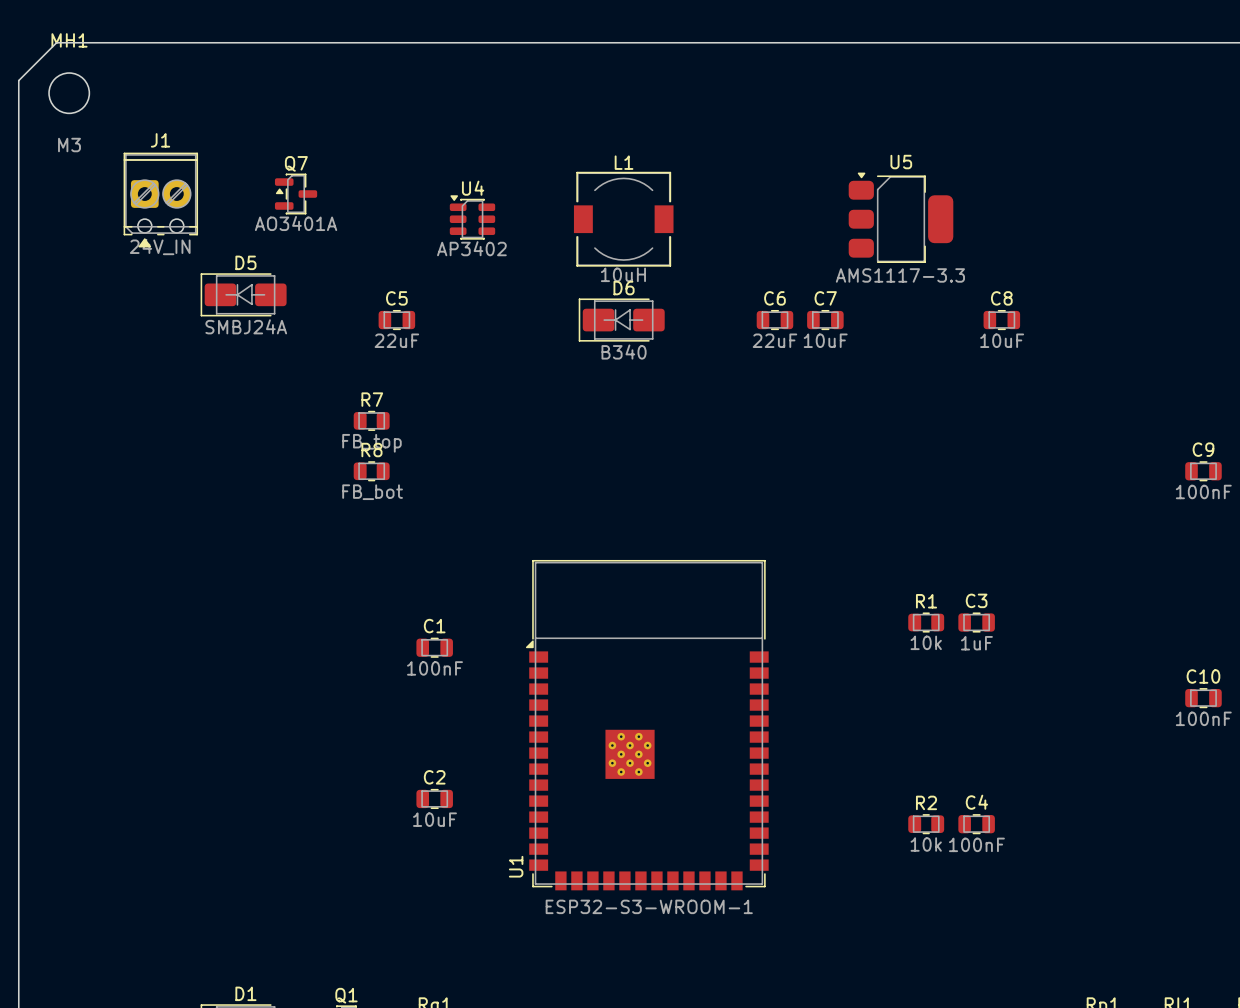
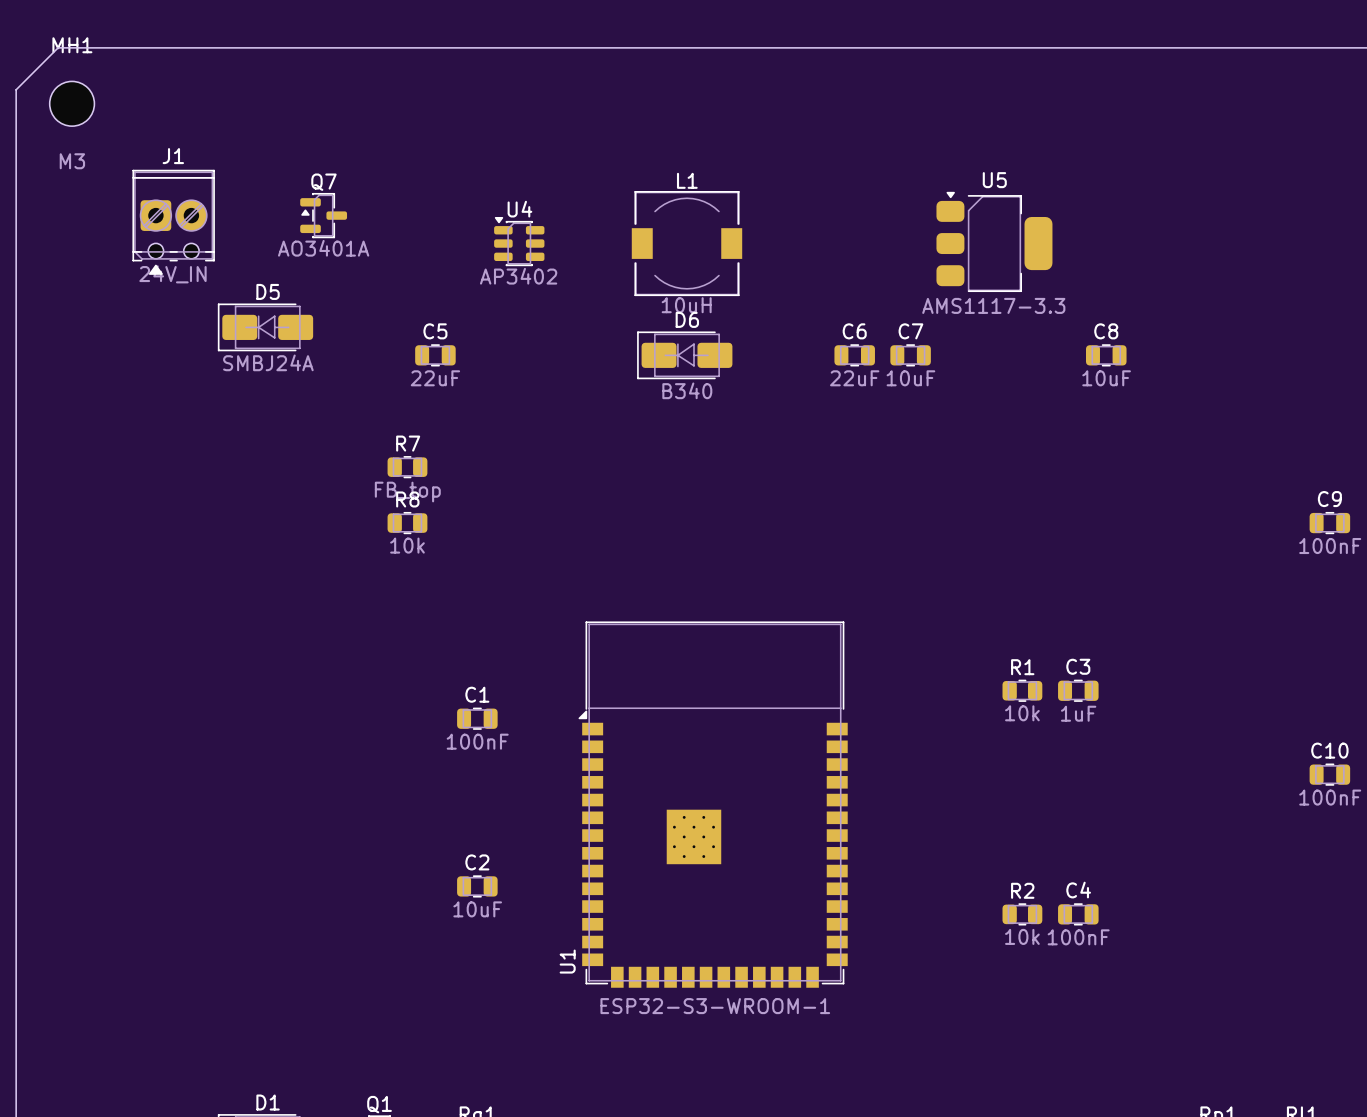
R8 value: FB_bot (372, 492) -> 10k (407, 545)

